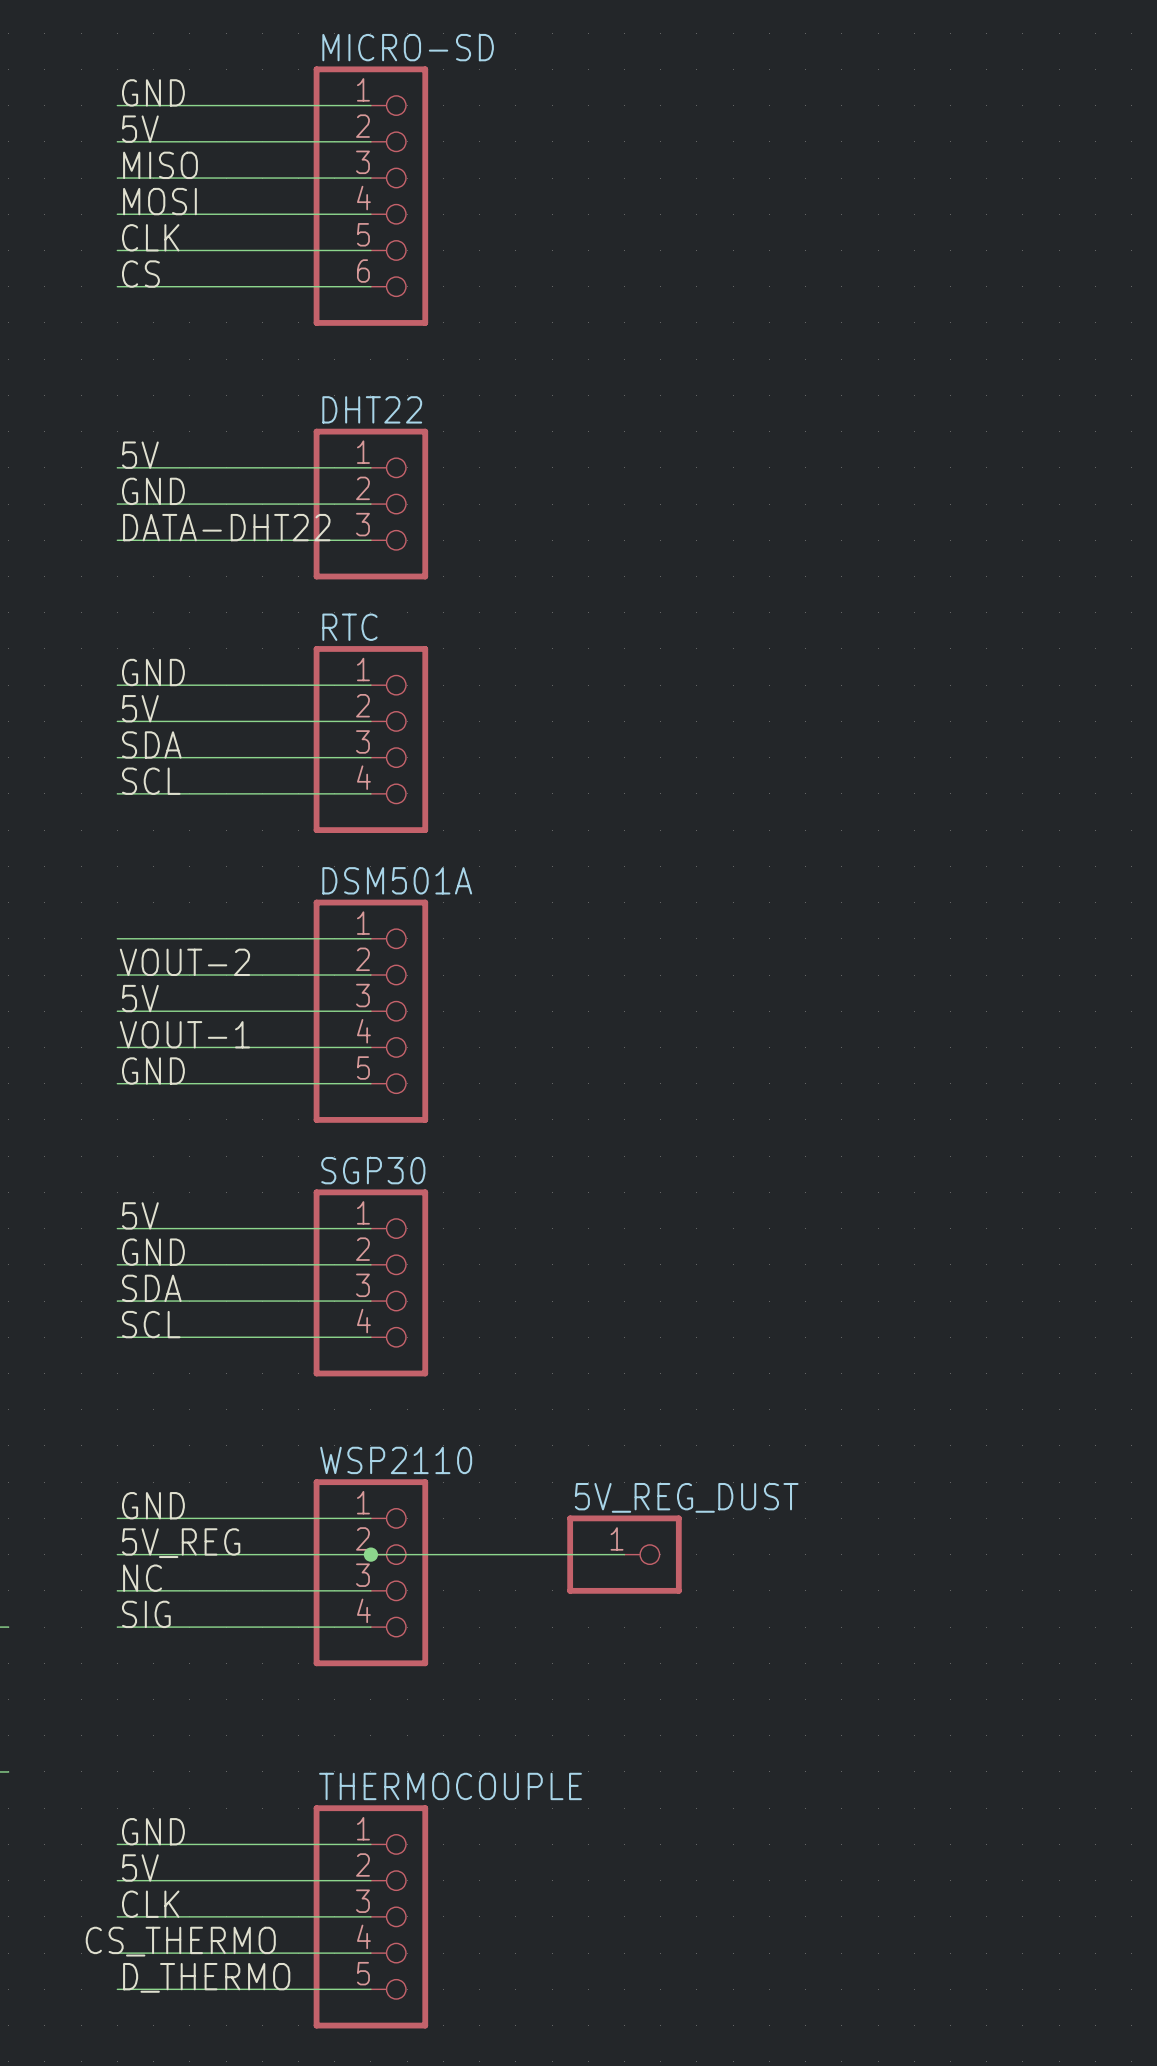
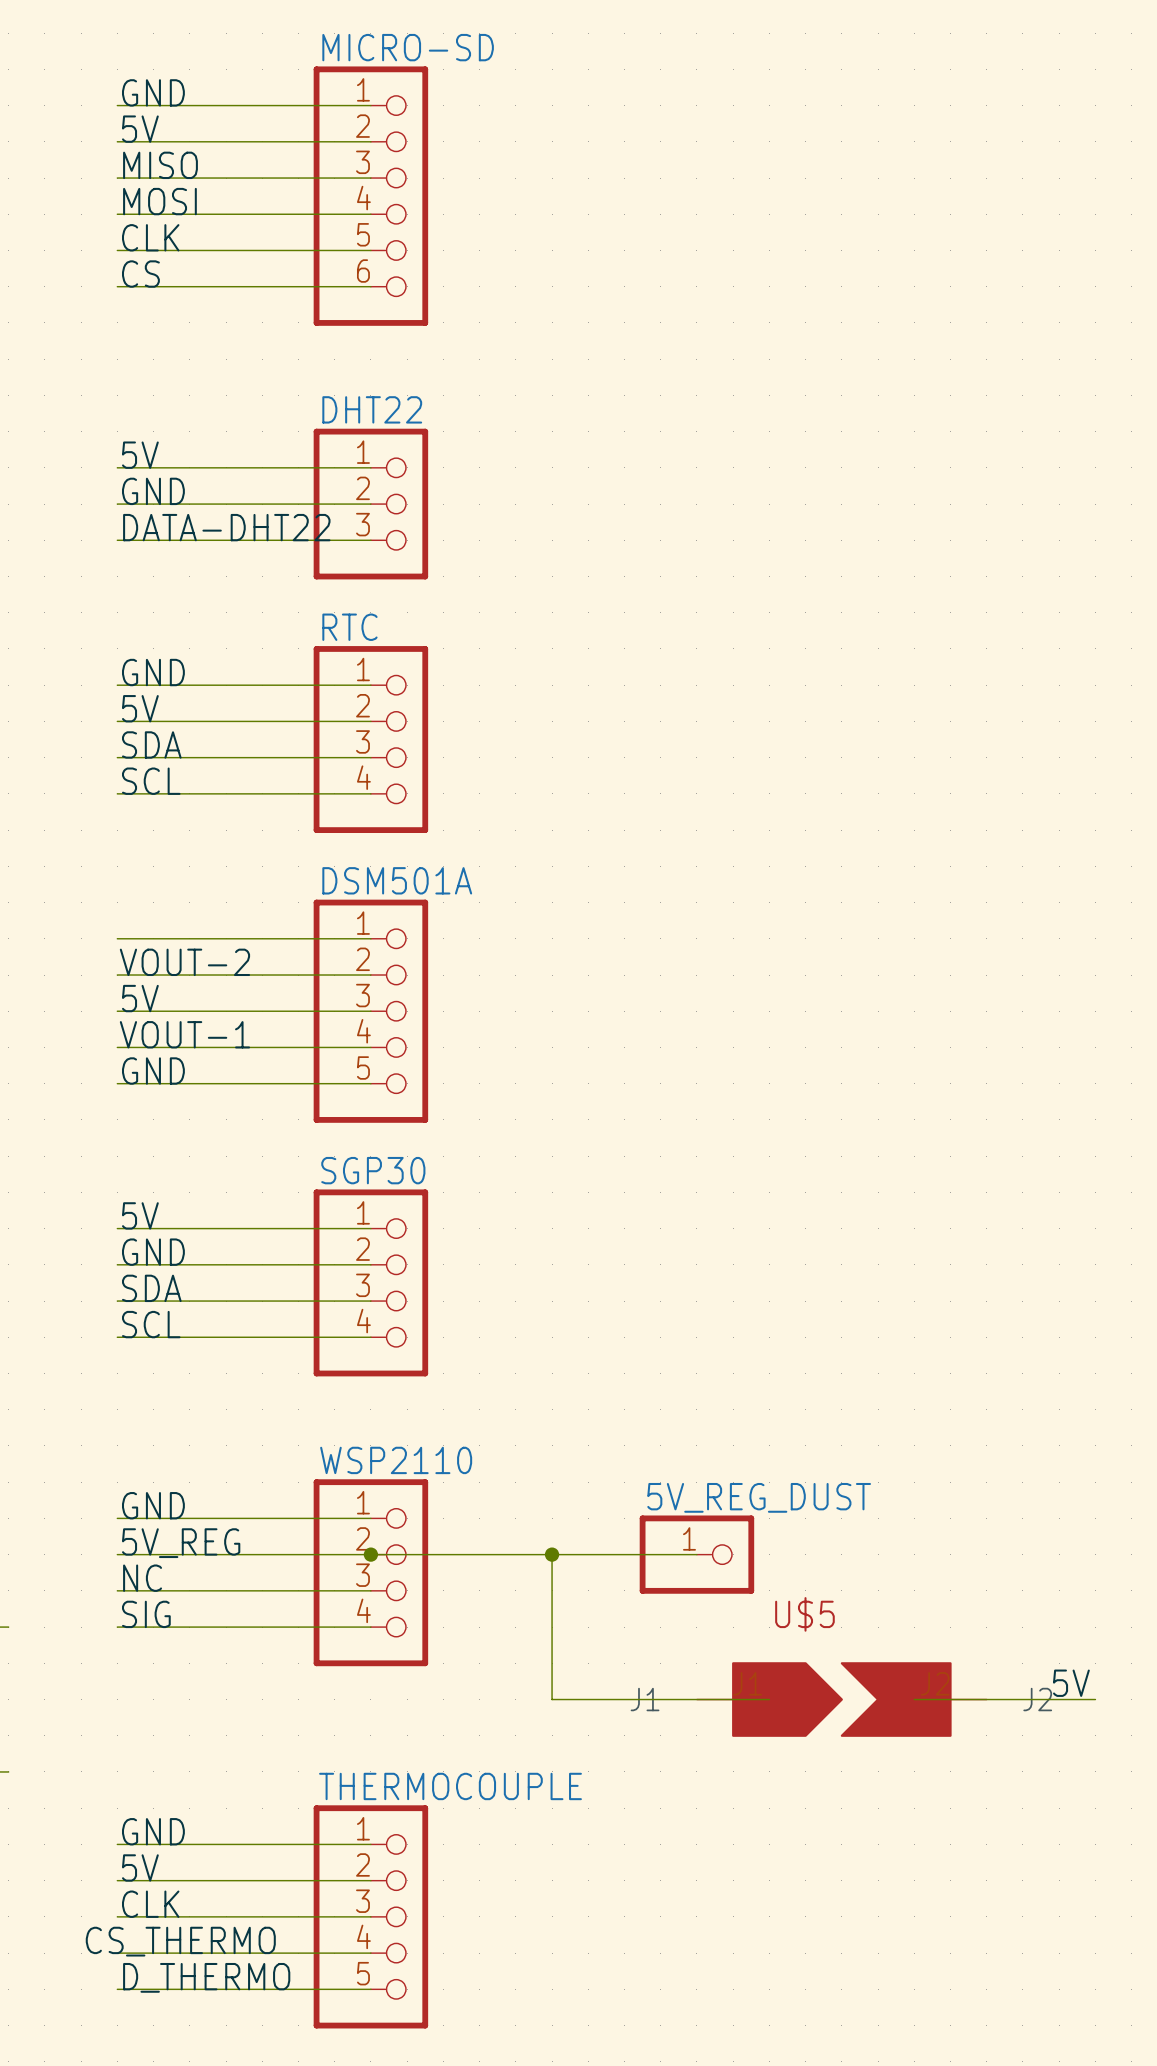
wire: none -> (552, 1554) (552, 1699) (769, 1699)
junction: none -> (552, 1554)
wire: none -> (624, 1554) (696, 1554)
5V_REG_DUST position: (624, 1554) -> (696, 1554)
label: none -> 5V (1071, 1683)
U$5: none -> (841, 1699)
wire: none -> (914, 1699) (1095, 1699)

